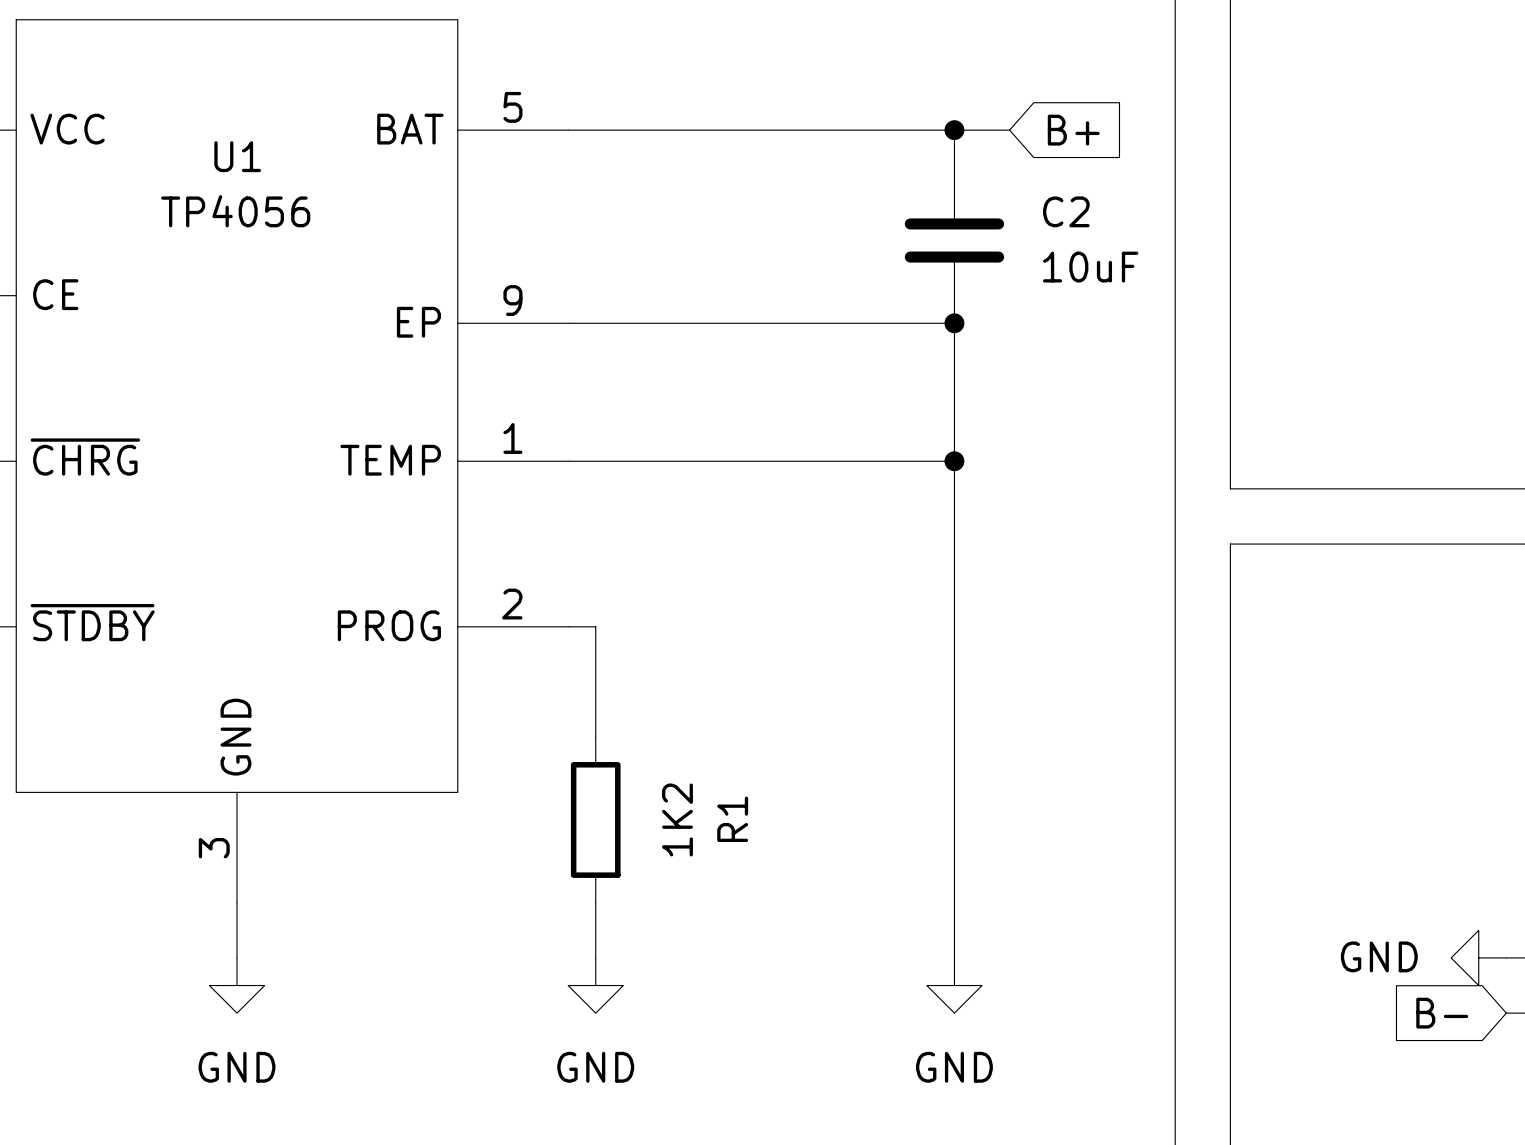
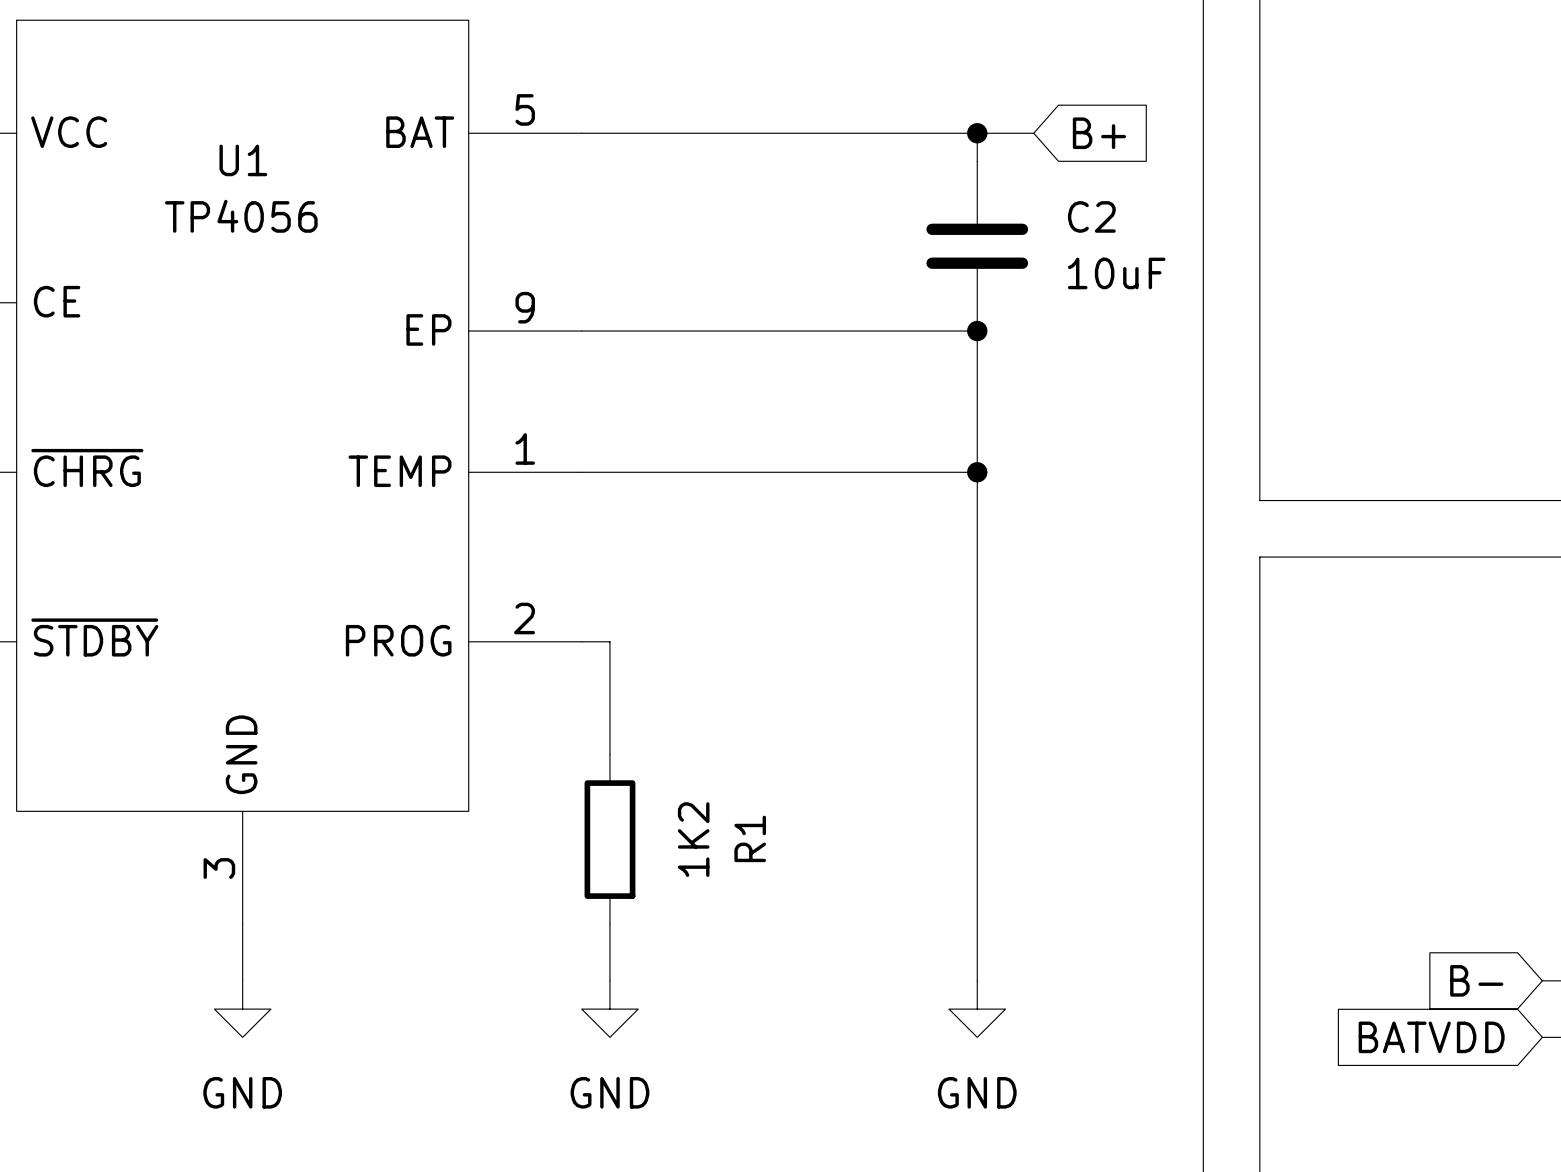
global label: none -> B- (1476, 980)
power symbol: GND (1478, 957) -> none
global label: B- (1442, 1013) -> BATVDD (1431, 1037)

